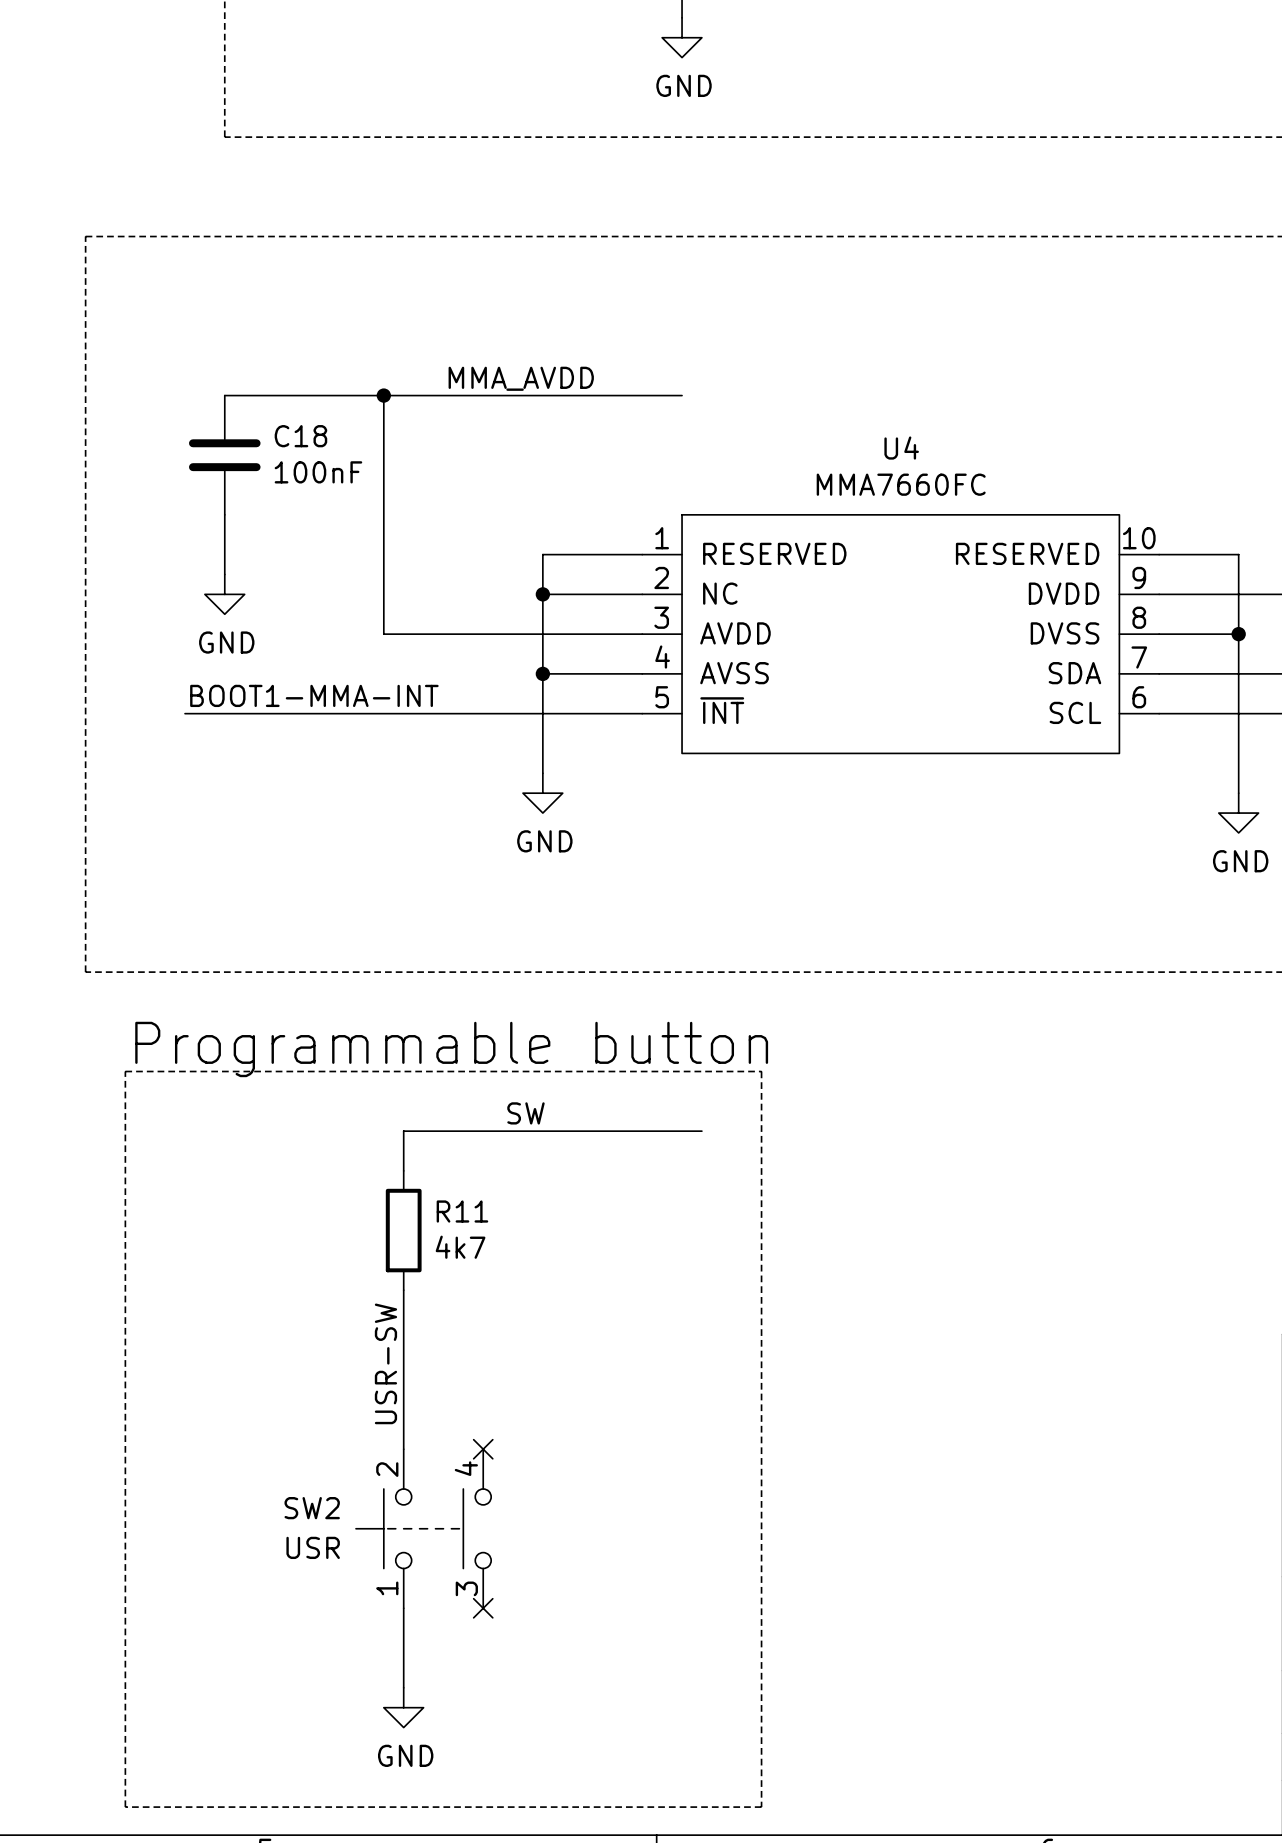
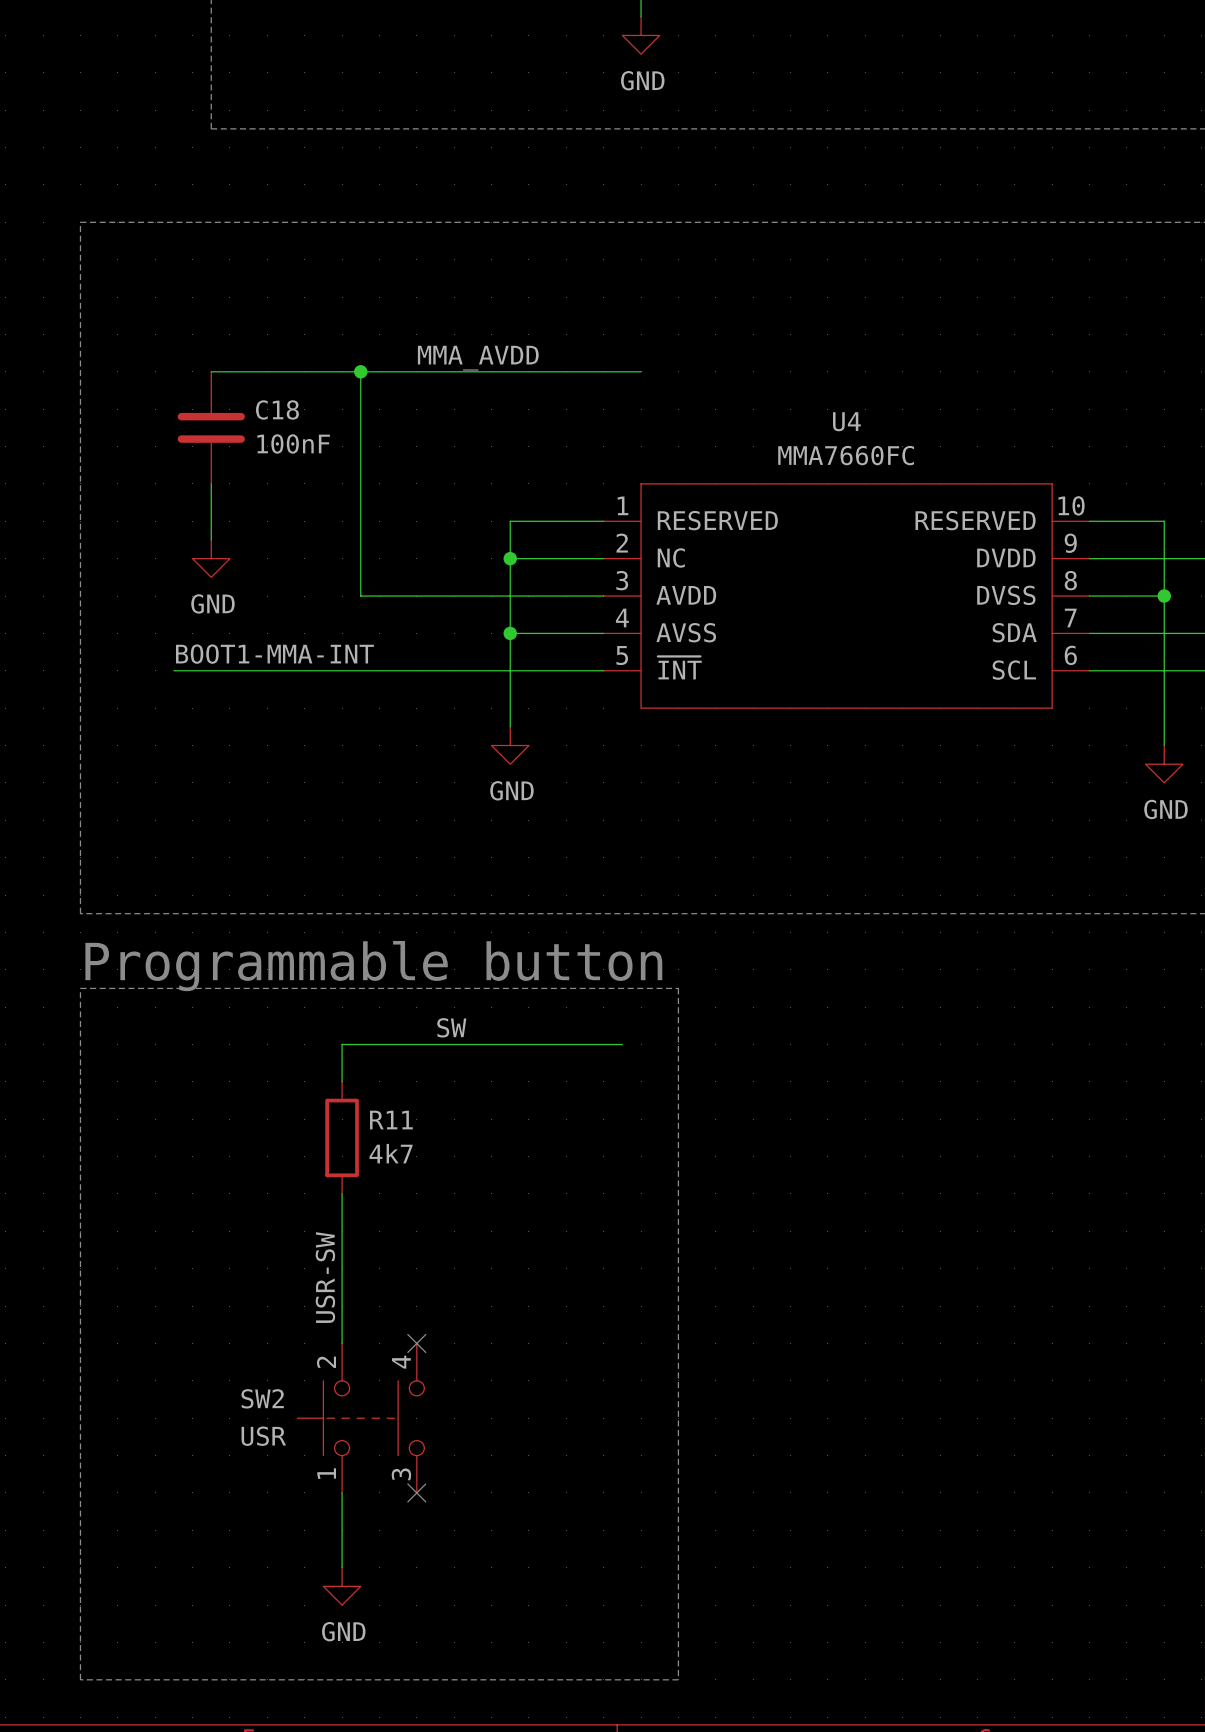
text position: Programmable button (451, 1049) -> Programmable button (373, 966)
line: (125, 1071) (761, 1071) (761, 1807) (125, 1807) (125, 1071) -> (80, 988) (678, 988) (678, 1679) (80, 1679) (80, 988)
label position: SW (525, 1113) -> SW (451, 1027)
wire: (701, 1131) (403, 1131) (403, 1170) -> (622, 1044) (342, 1044) (342, 1081)
R11 position: (403, 1230) -> (342, 1137)
wire: (403, 1290) (403, 1449) -> (342, 1193) (342, 1343)
label position: USR-SW (385, 1363) -> USR-SW (325, 1277)
no-connect mark position: (483, 1449) -> (416, 1343)
SW2 position: (423, 1528) -> (360, 1418)
wire: (403, 1608) (403, 1687) -> (342, 1492) (342, 1567)
no-connect mark position: (483, 1608) -> (416, 1492)
power symbol position: GND (403, 1707) -> GND (342, 1586)

